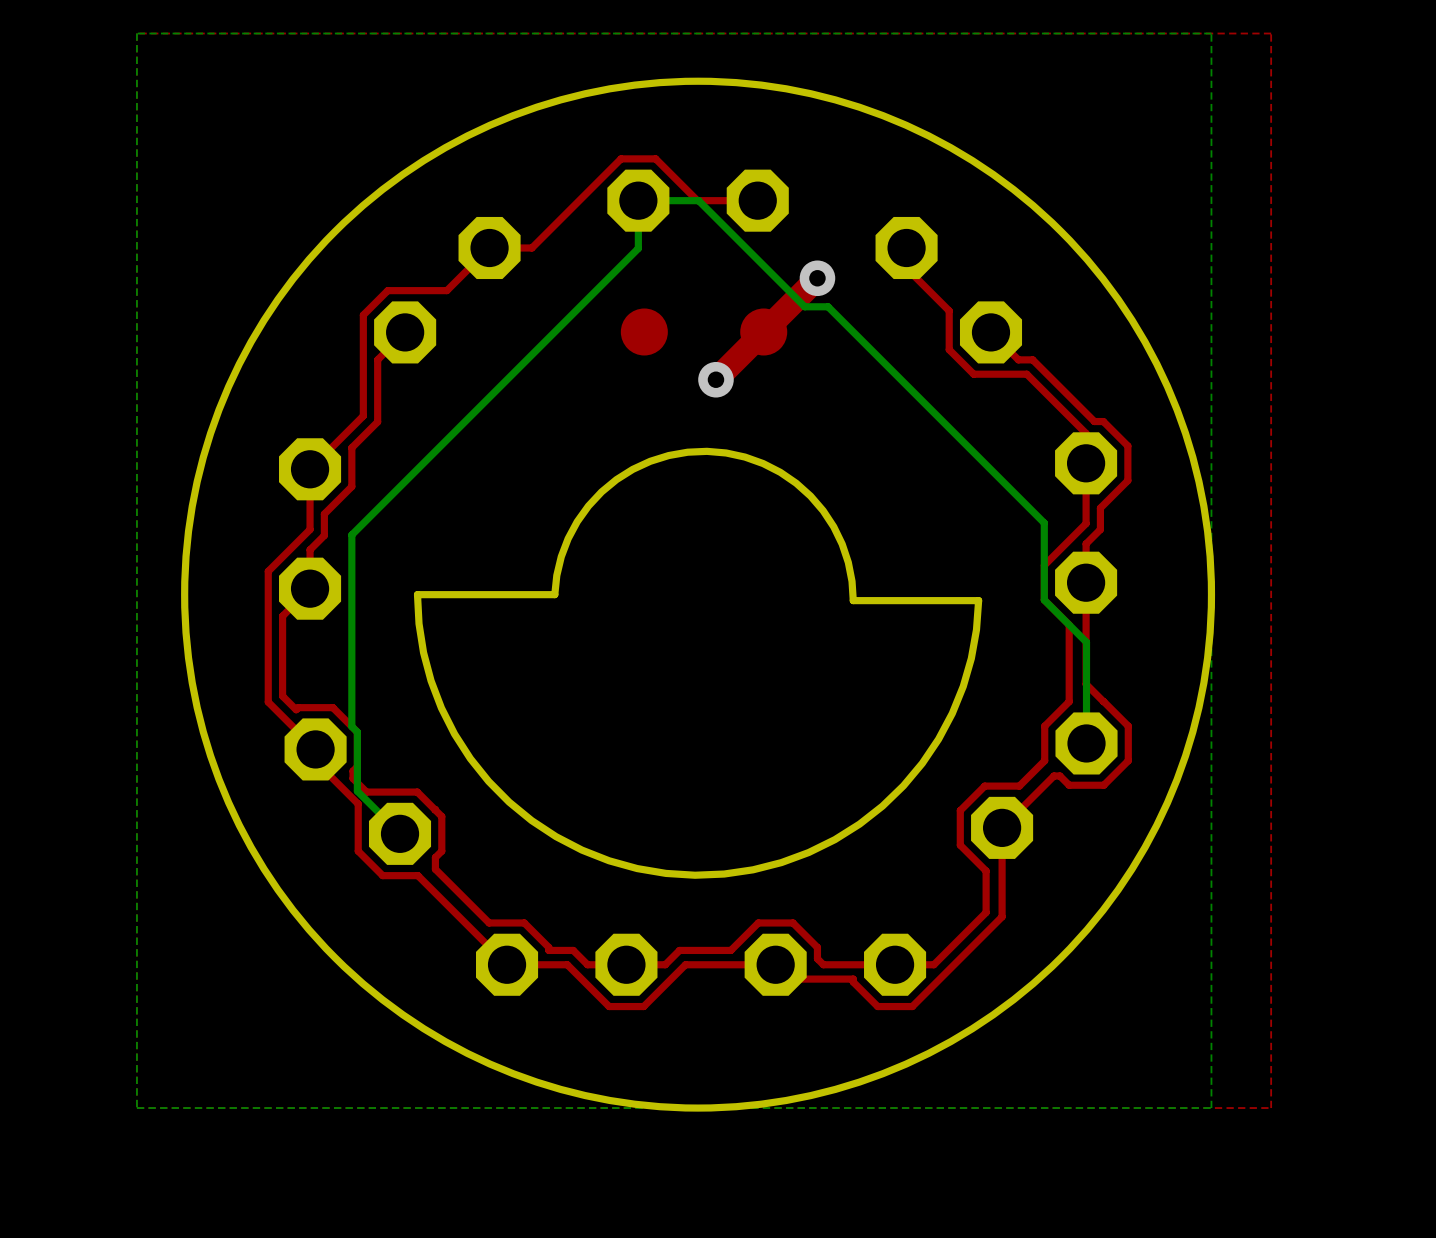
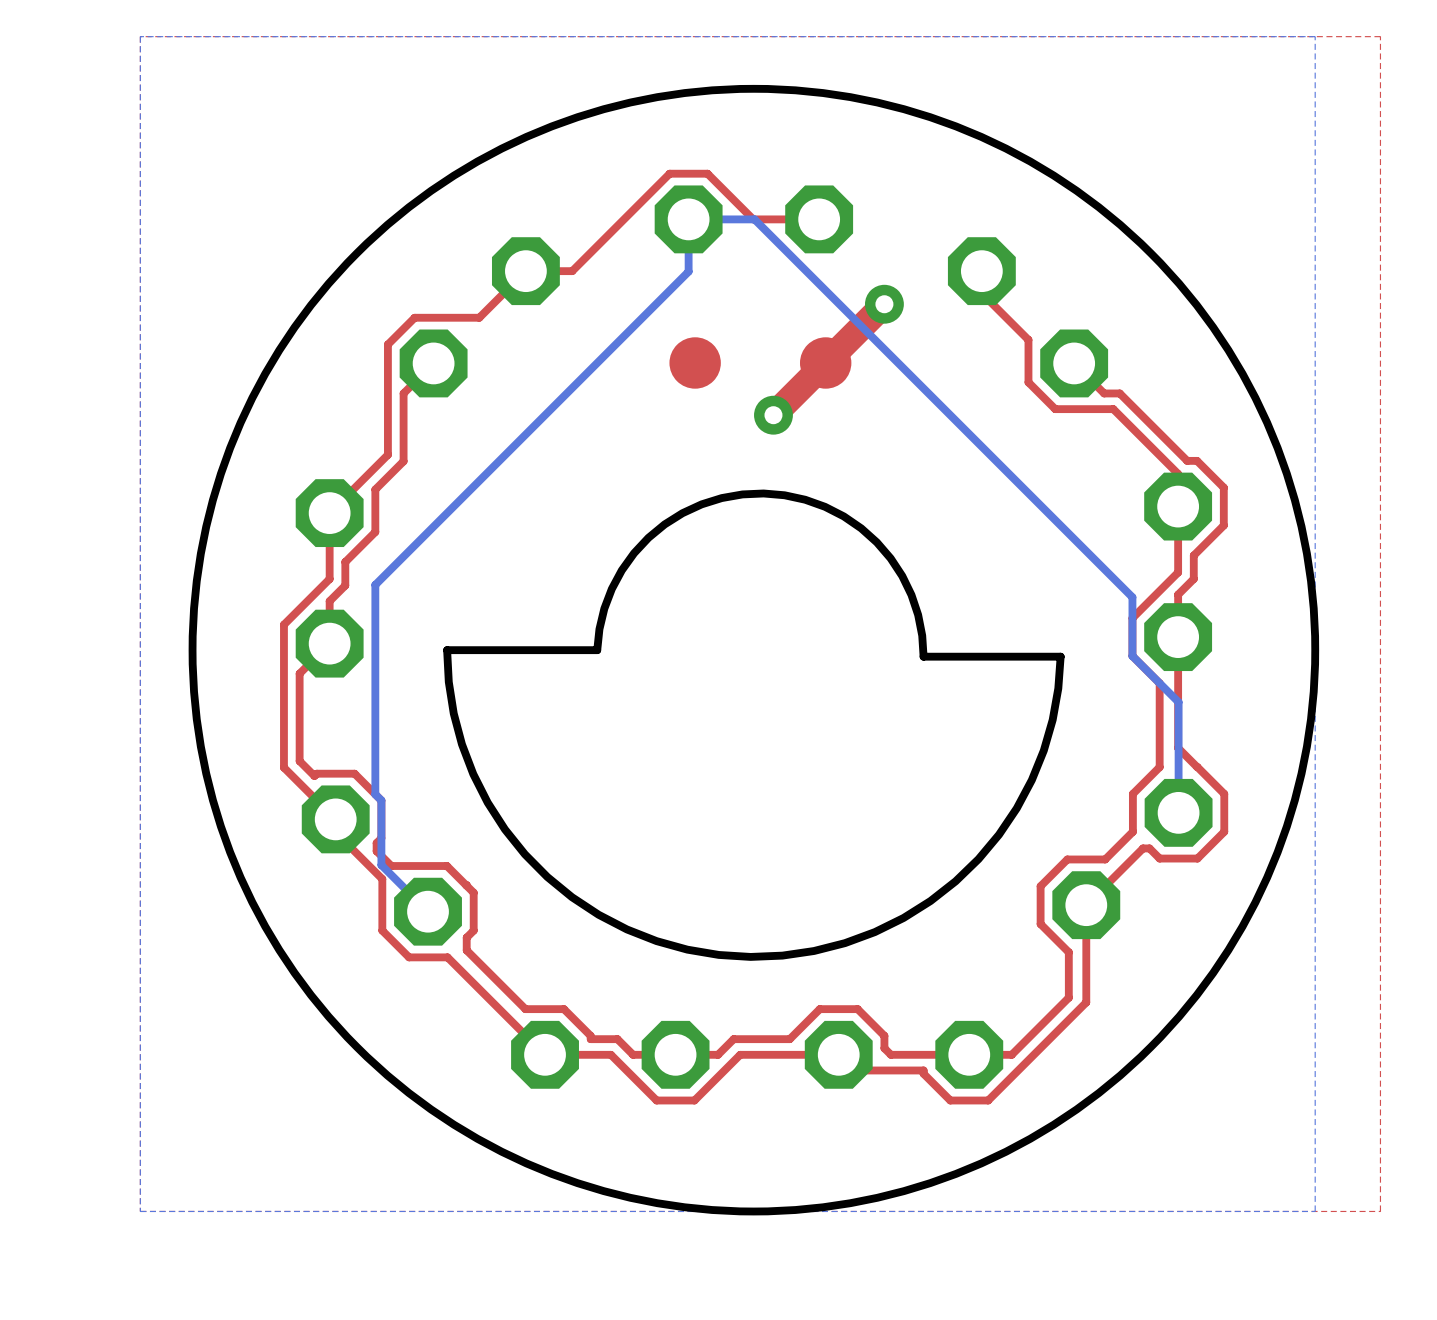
bottom track: (804, 306) (828, 306) (1044, 523) (1044, 546) -> (870, 335) (1132, 597)

